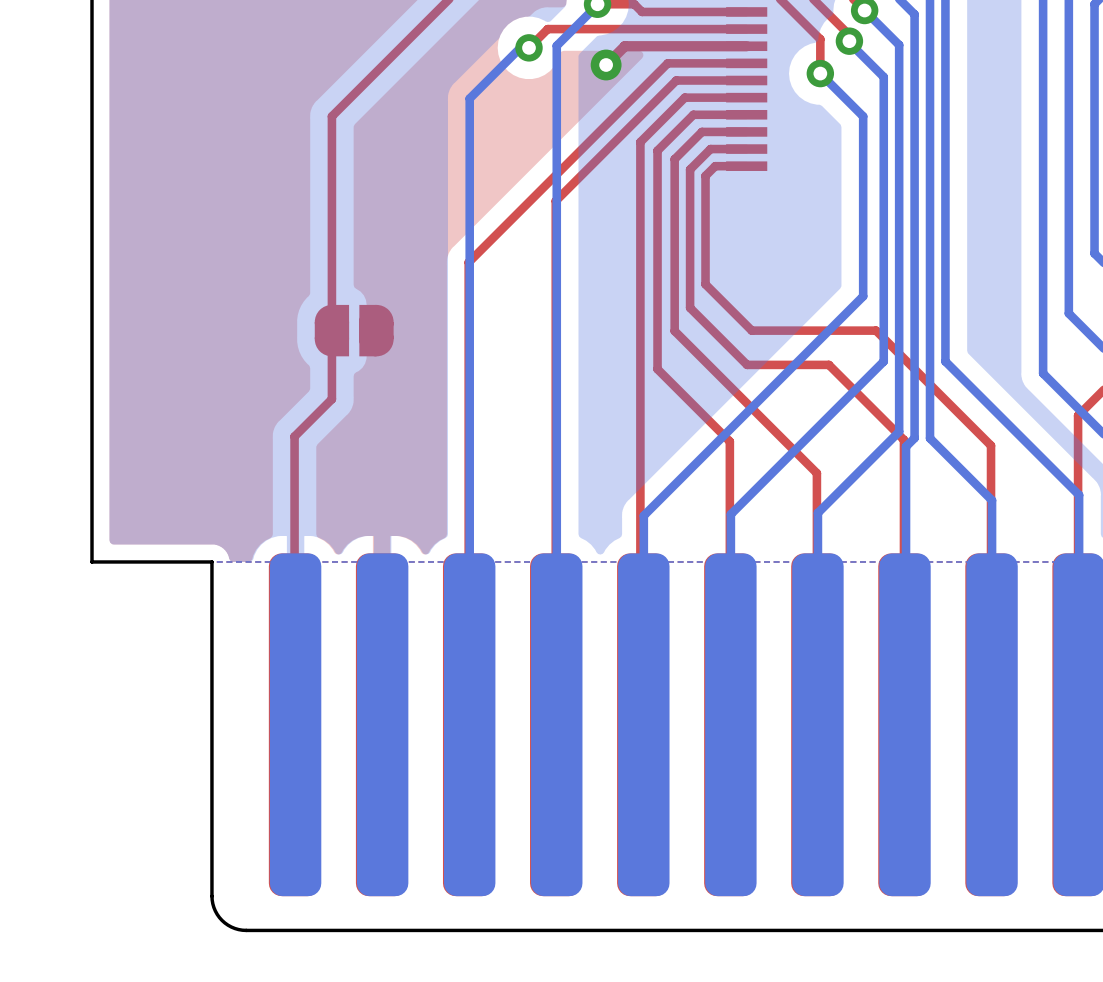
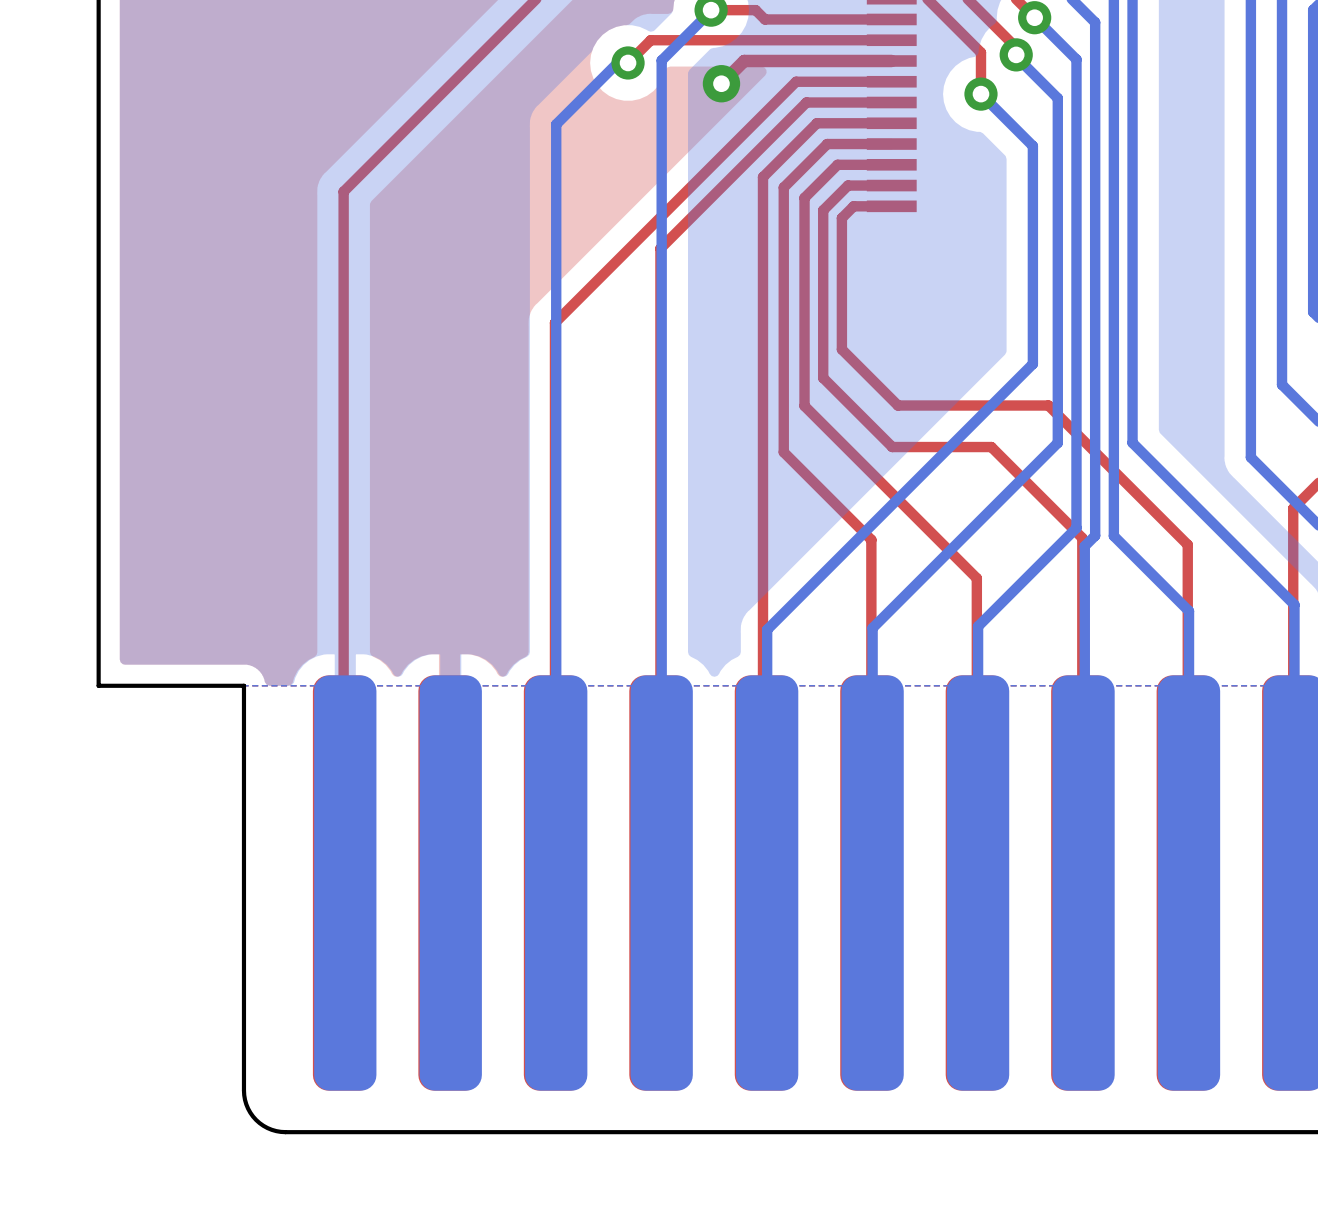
top track: (331, 116) (331, 399) (294, 436) (294, 724) -> (389, 146) (343, 191) (343, 882)
part: (354, 330) -> none

